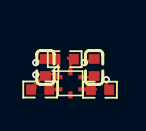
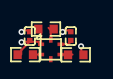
part footprint: [35, 49, 56, 86] -> [23, 26, 36, 46]
part footprint: [83, 49, 105, 86] -> [64, 26, 77, 46]

